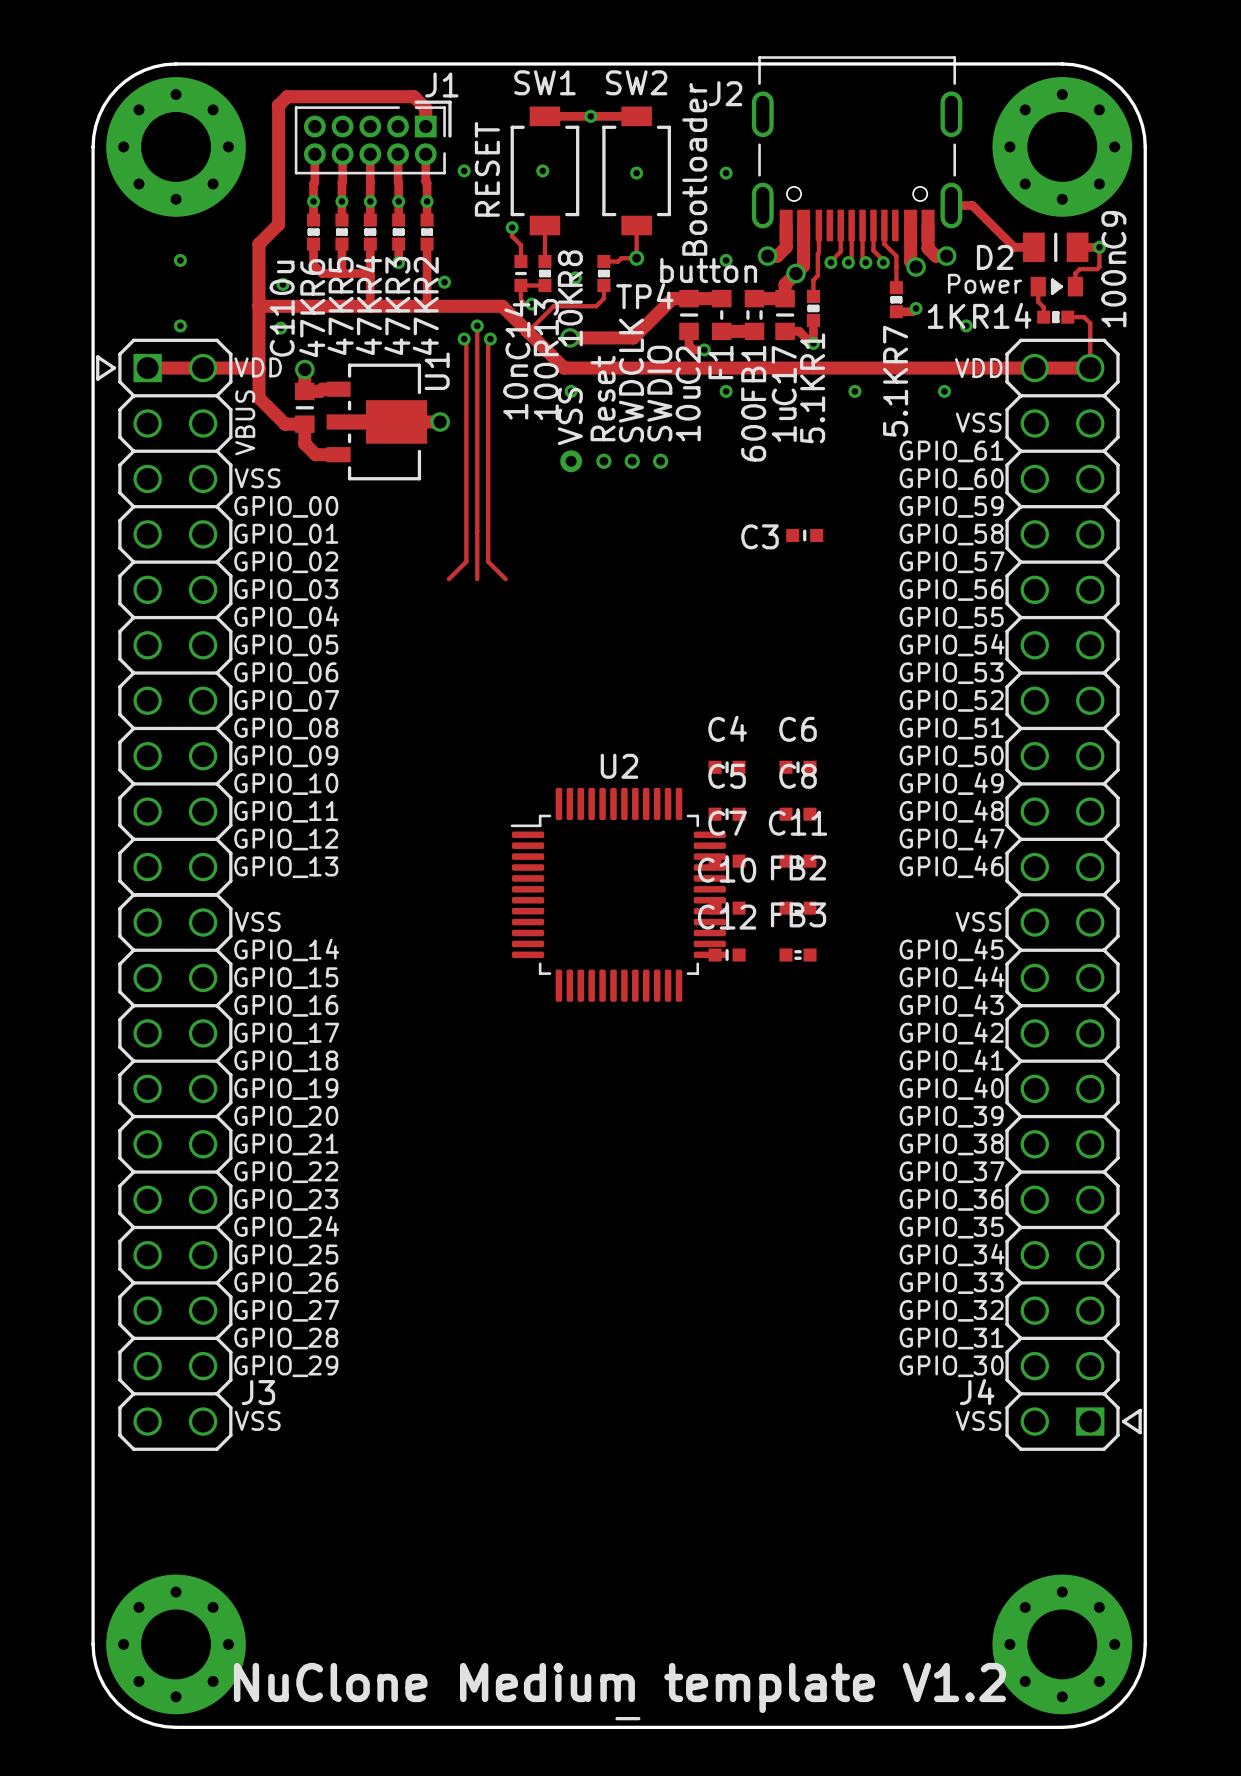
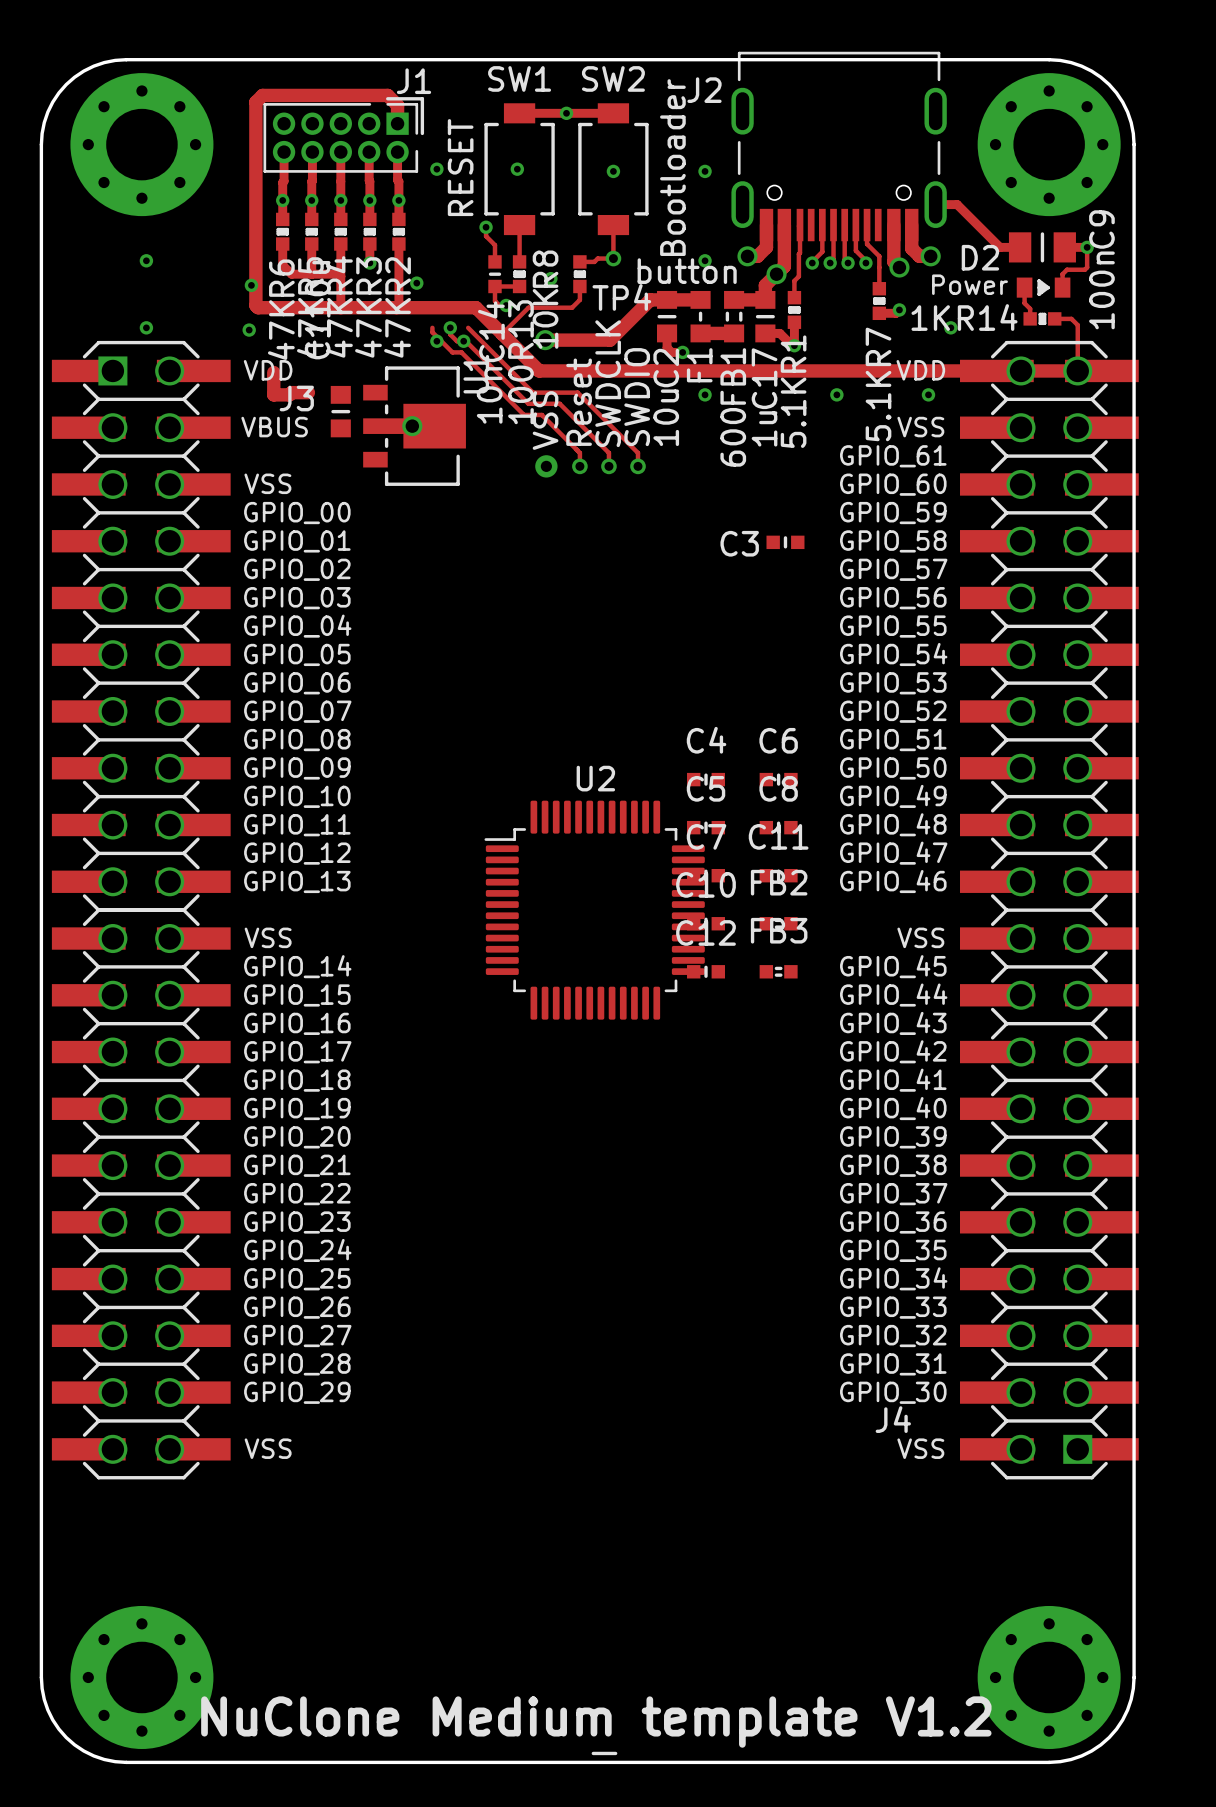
board edge: (176, 63) (144, 70) (117, 88) (99, 115) (93, 146) (93, 1644) (99, 1676) (117, 1703) (144, 1721) (176, 1727) -> (141, 59) (104, 62) (74, 77) (52, 102) (44, 122) (41, 144) (41, 1677) (44, 1699) (52, 1719) (74, 1744) (104, 1759) (141, 1762)
track: (416, 98) (413, 96) (287, 96) (278, 105) (278, 224) (258, 244) (258, 397) (285, 424) (304, 424) (304, 443) (315, 454) (338, 454) -> (387, 95) (262, 95) (255, 102) (255, 305) (258, 307)
track: (258, 306) (289, 306) -> none
track: none -> (432, 327) (432, 332) (452, 352) (461, 352) (524, 414) (541, 414) (579, 452) (579, 466)
track: none -> (468, 327) (532, 392) (577, 392) (638, 452) (638, 466)
track: (477, 332) (477, 579) -> (450, 334) (457, 341) (465, 341) (528, 403) (559, 403) (608, 452) (608, 466)
J3 footprint: [96, 338, 233, 1451] -> [51, 340, 231, 1480]
J4 footprint: [1005, 338, 1142, 1451] -> [960, 340, 1139, 1480]
track: (464, 339) (466, 341) (466, 561) (448, 579) -> none
track: (490, 339) (488, 341) (488, 561) (505, 579) -> none
track: (147, 368) (257, 368) (258, 369) -> none
via: (304, 369) -> none
via: (571, 391) -> none
C1 position: (304, 407) -> (340, 411)
U1 position: (376, 421) -> (414, 426)
J3 name position: J3 (258, 1392) -> J3 (296, 398)
J4 name position: J4 (977, 1392) -> J4 (893, 1419)

